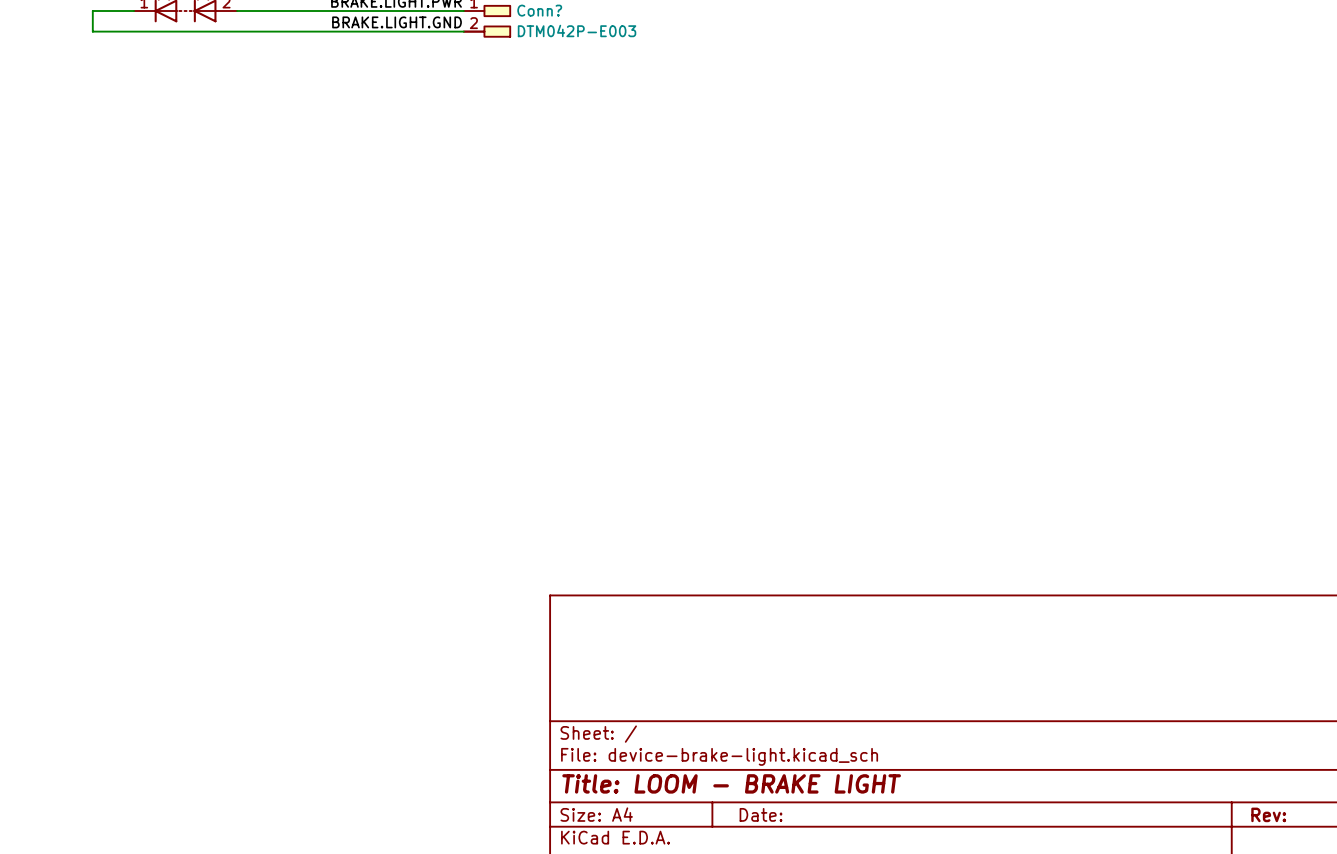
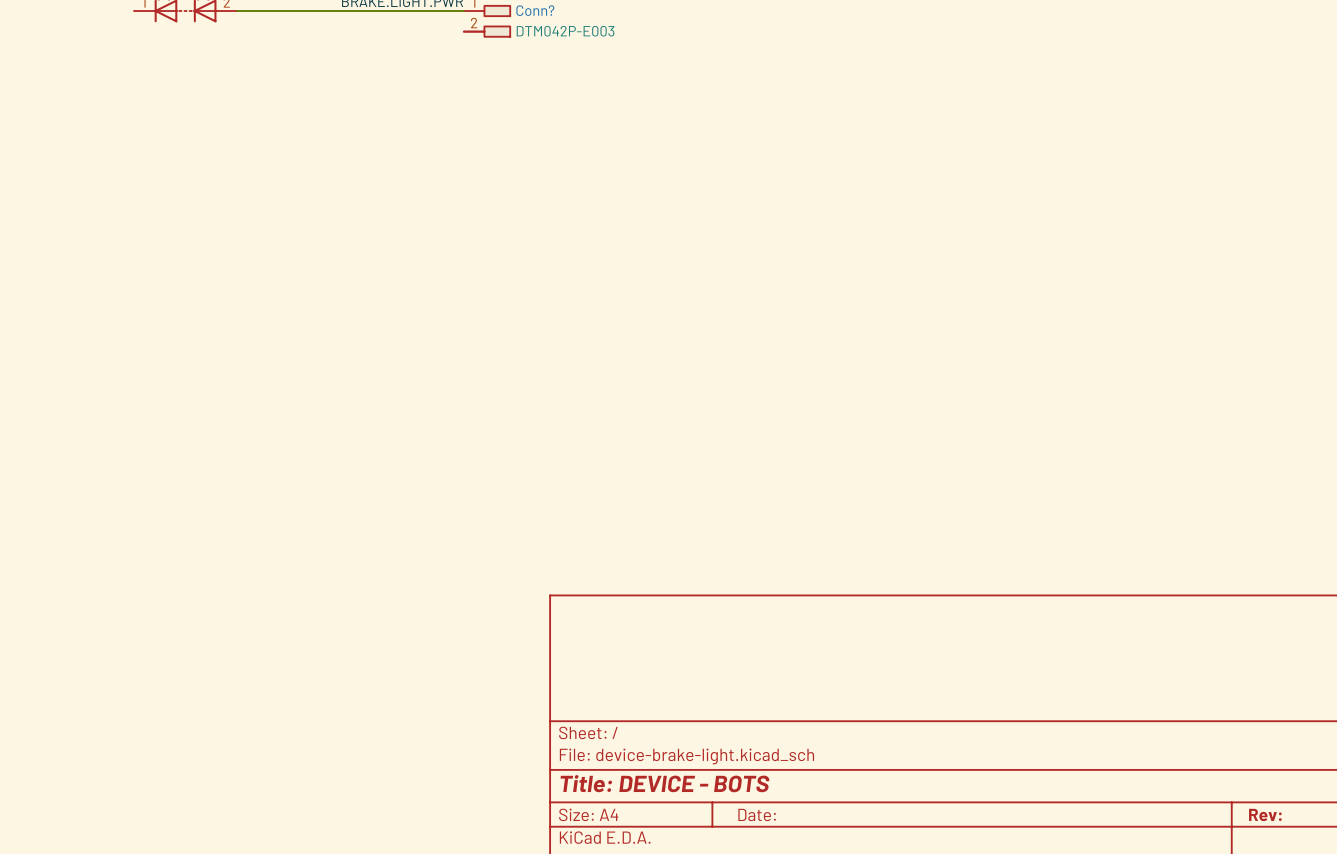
wire: (134, 11) (92, 11) (92, 31) (463, 31) -> none
label: BRAKE.LIGHT.GND (397, 22) -> none
title block: Title: LOOM - BRAKE LIGHT (731, 783) -> Title: DEVICE - BOTS (664, 783)

